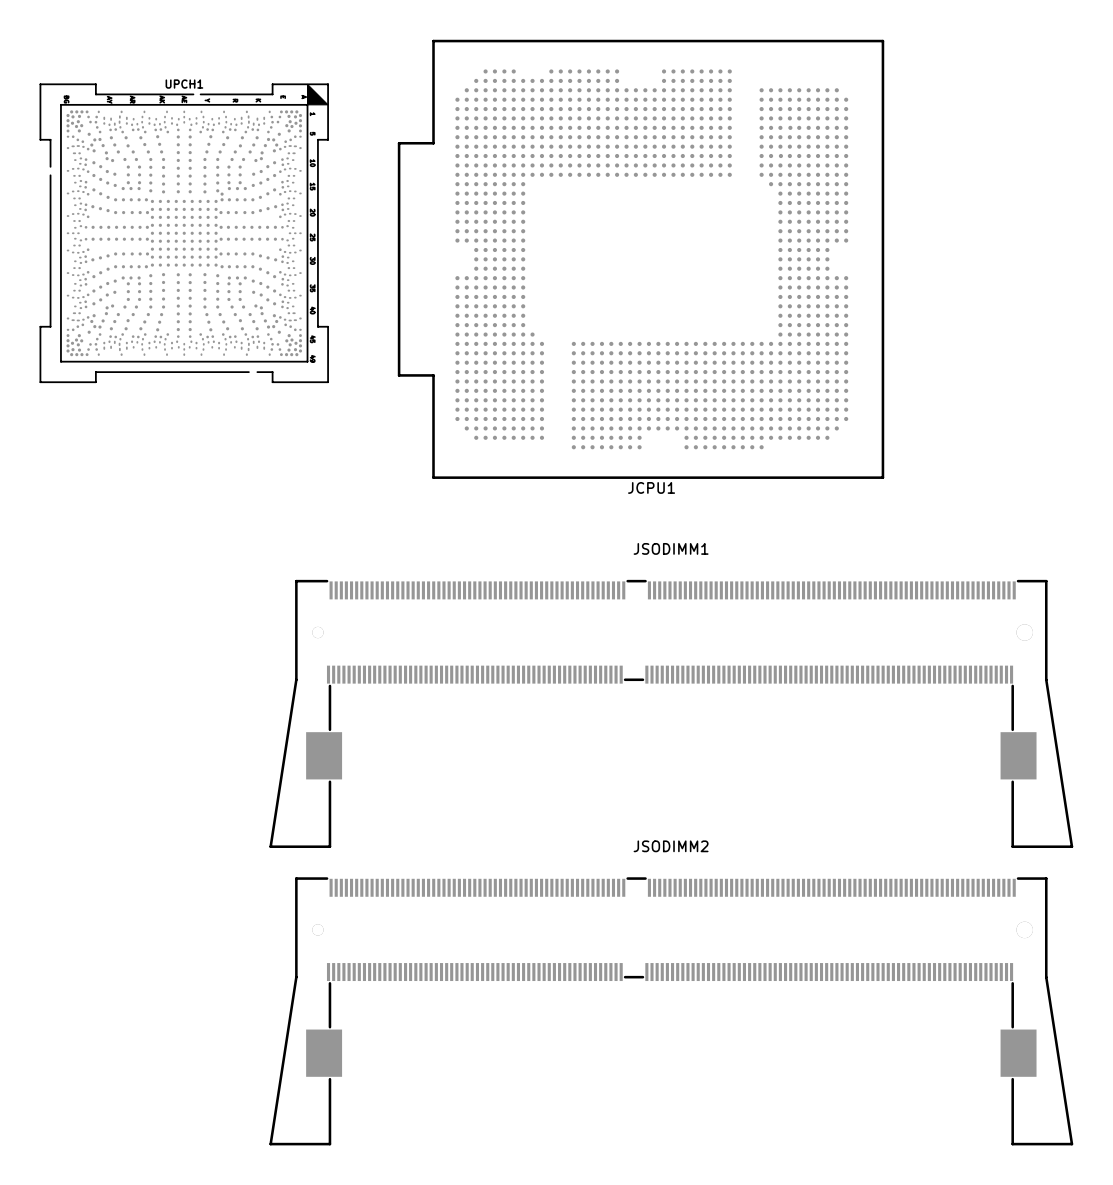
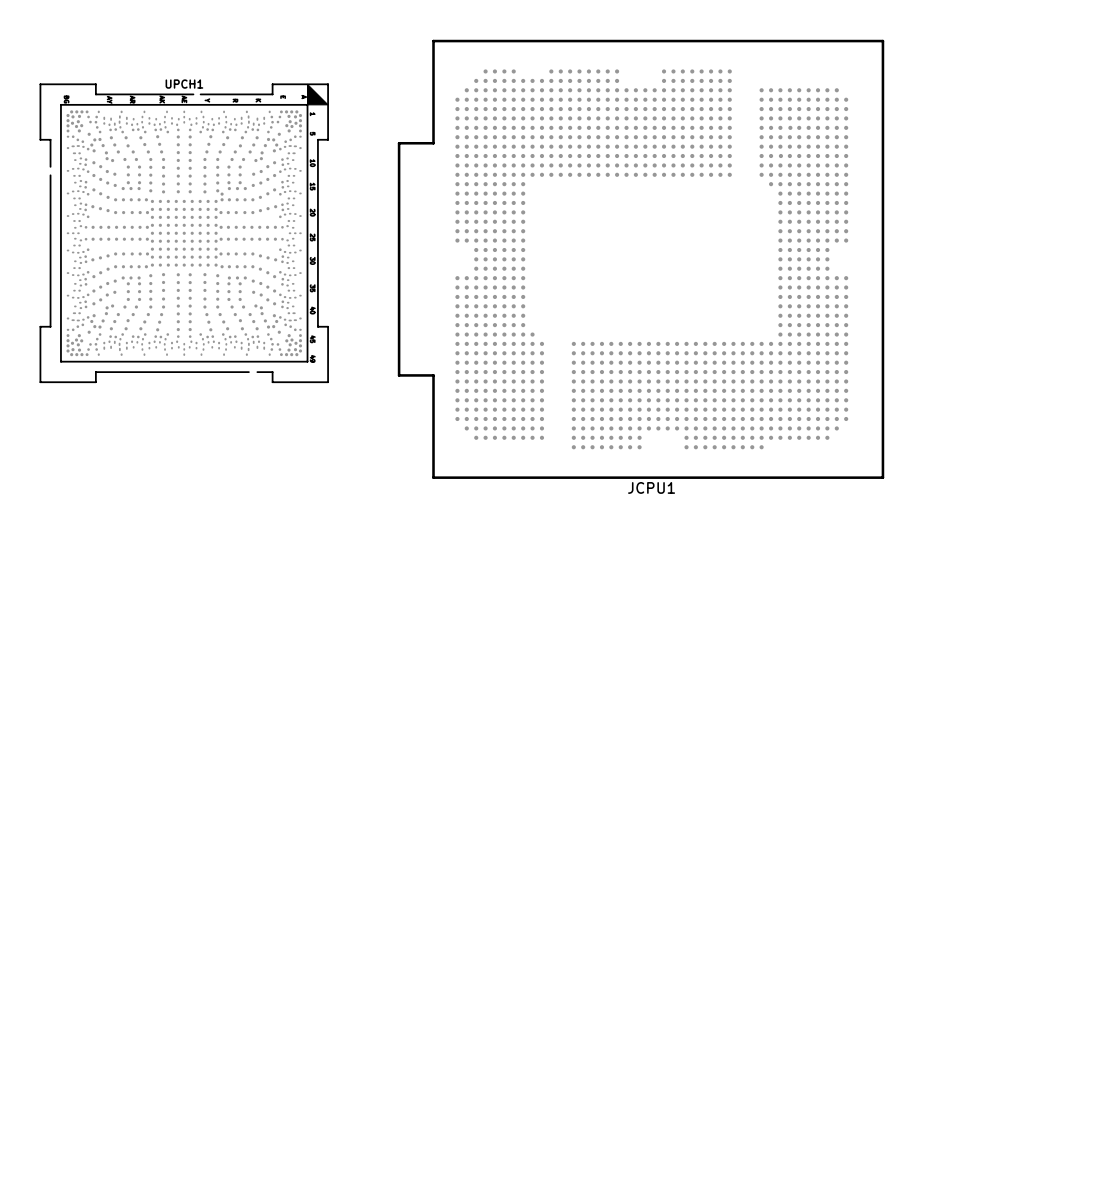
JSODIMM1: (671, 713) -> none
JSODIMM2: (671, 1011) -> none

